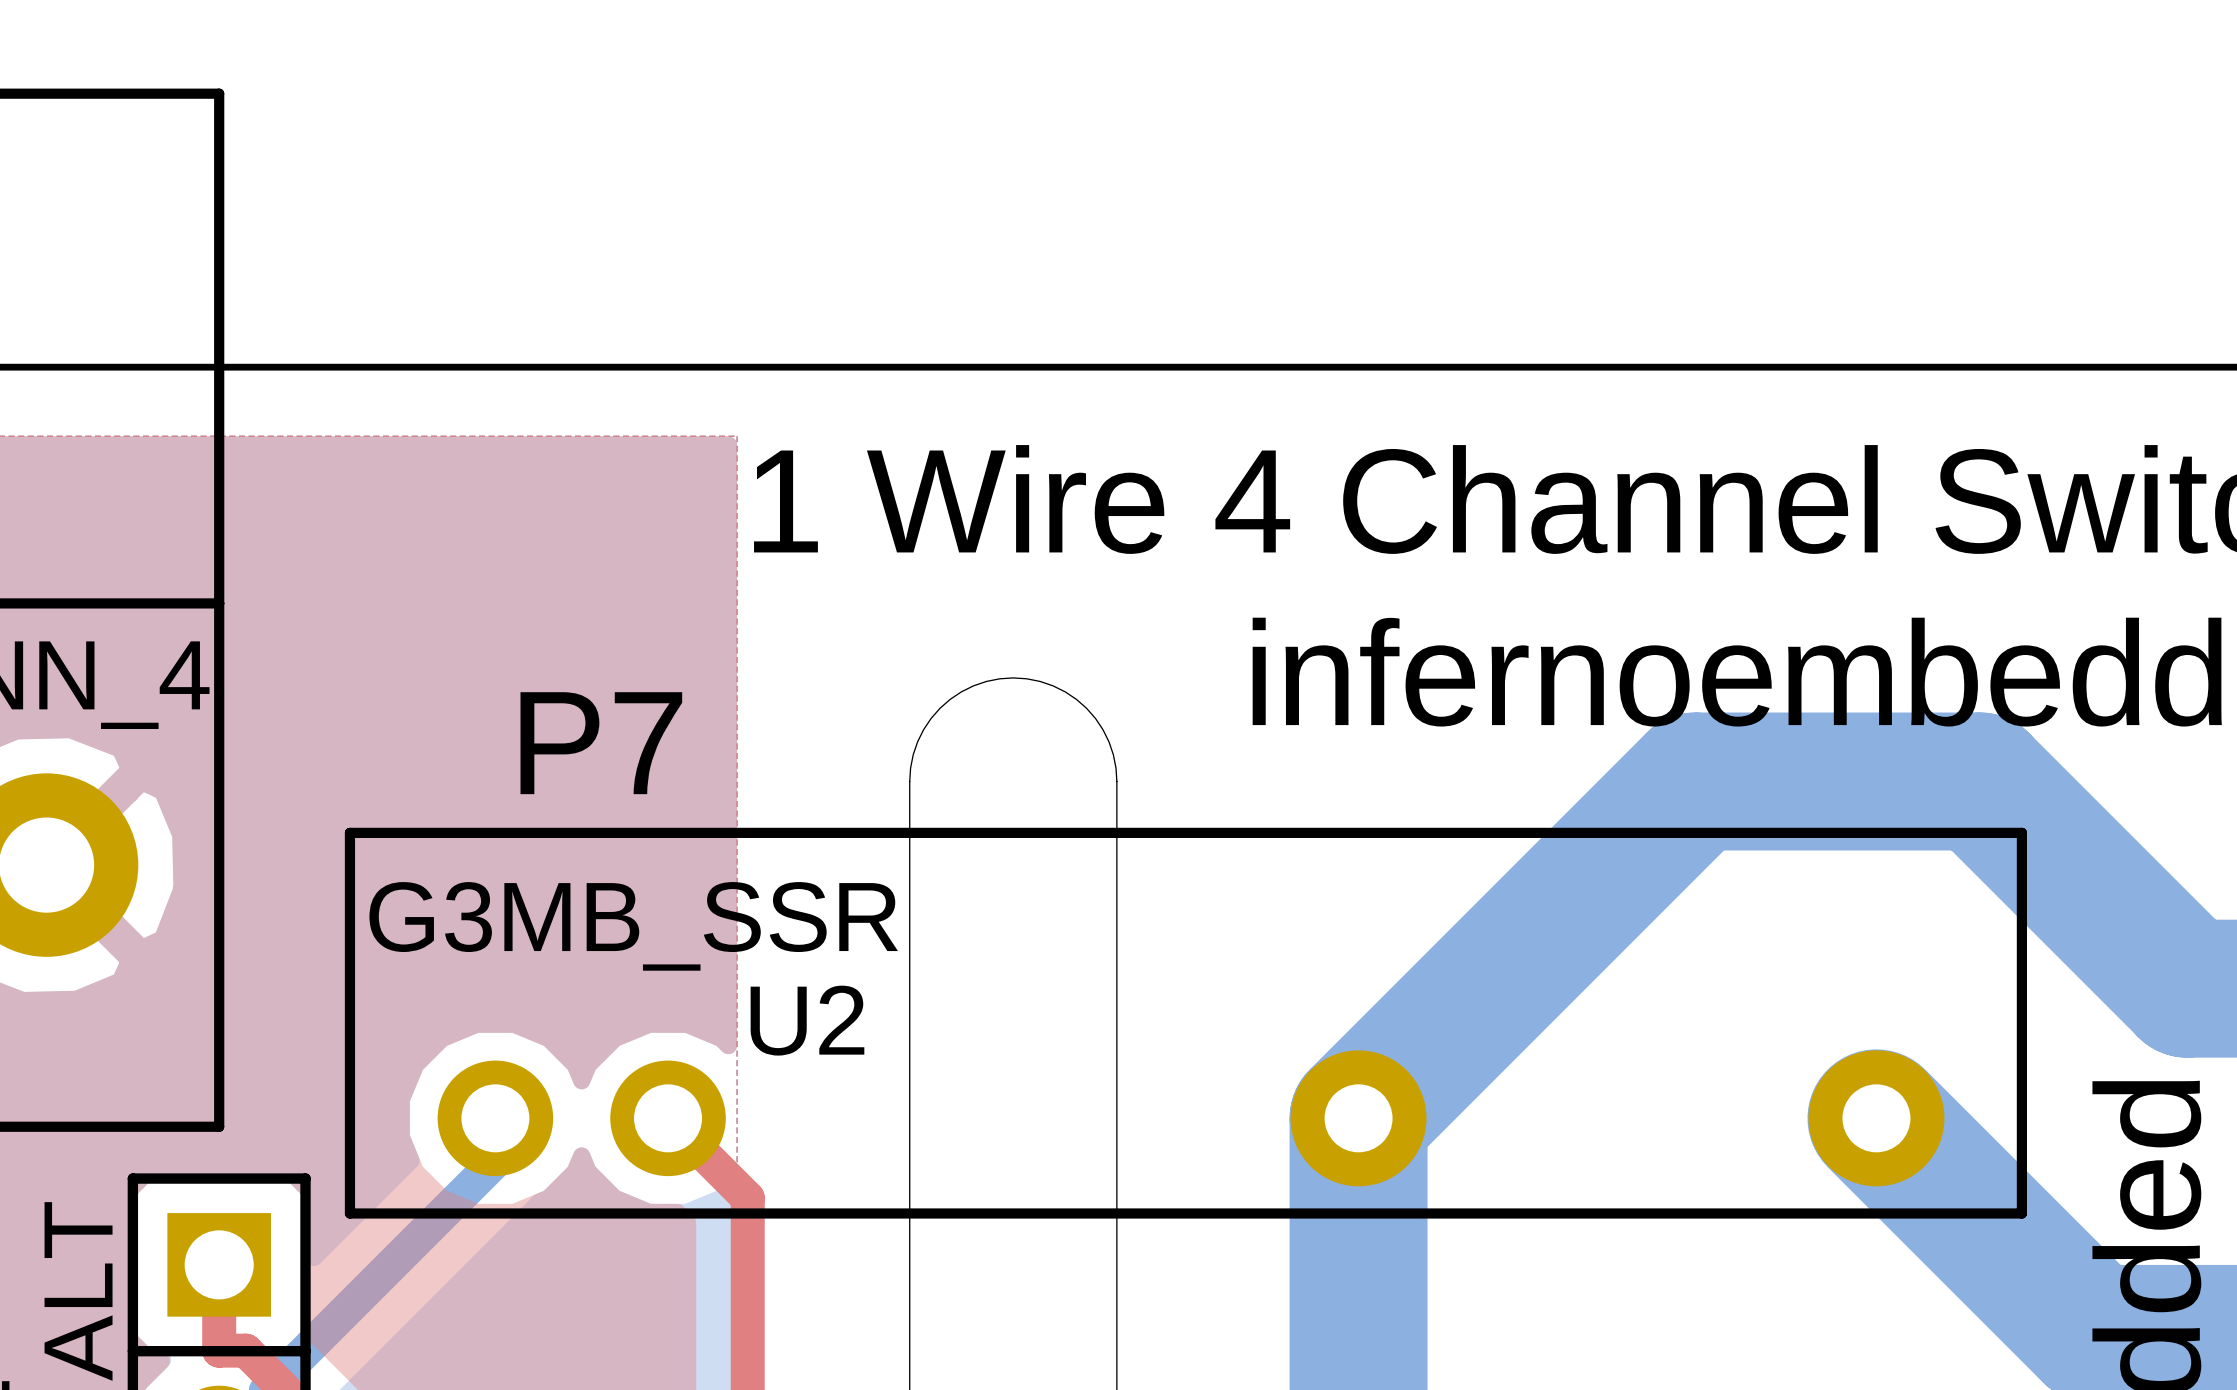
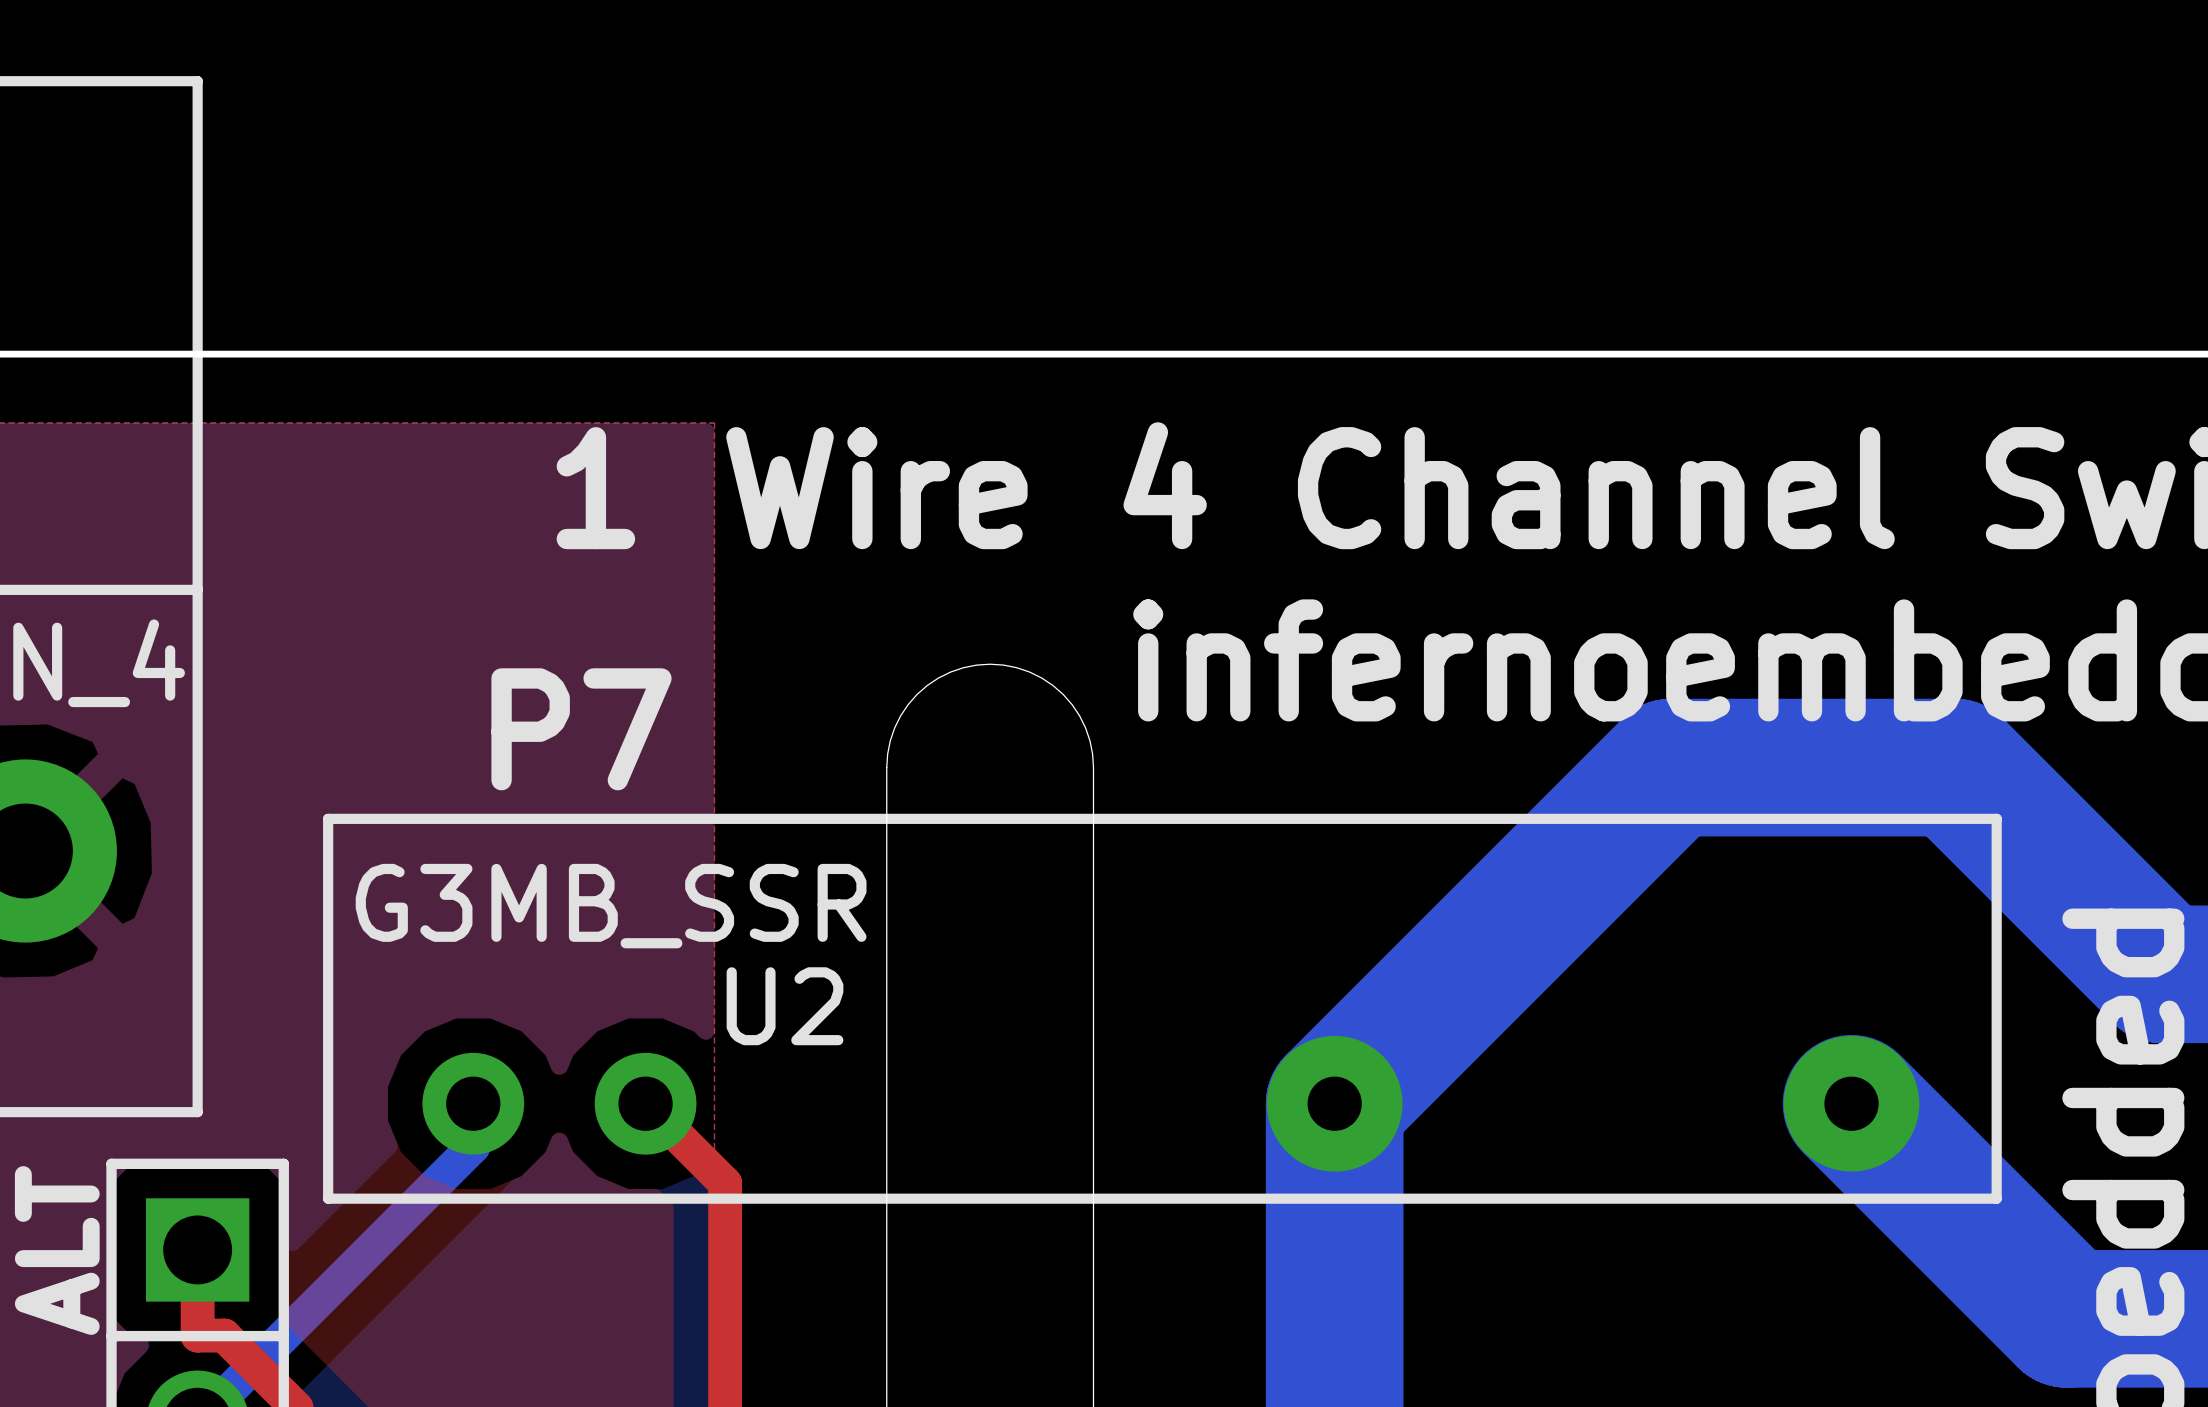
U2 footprint: [344, 827, 2028, 1219] -> [323, 813, 2002, 1204]

